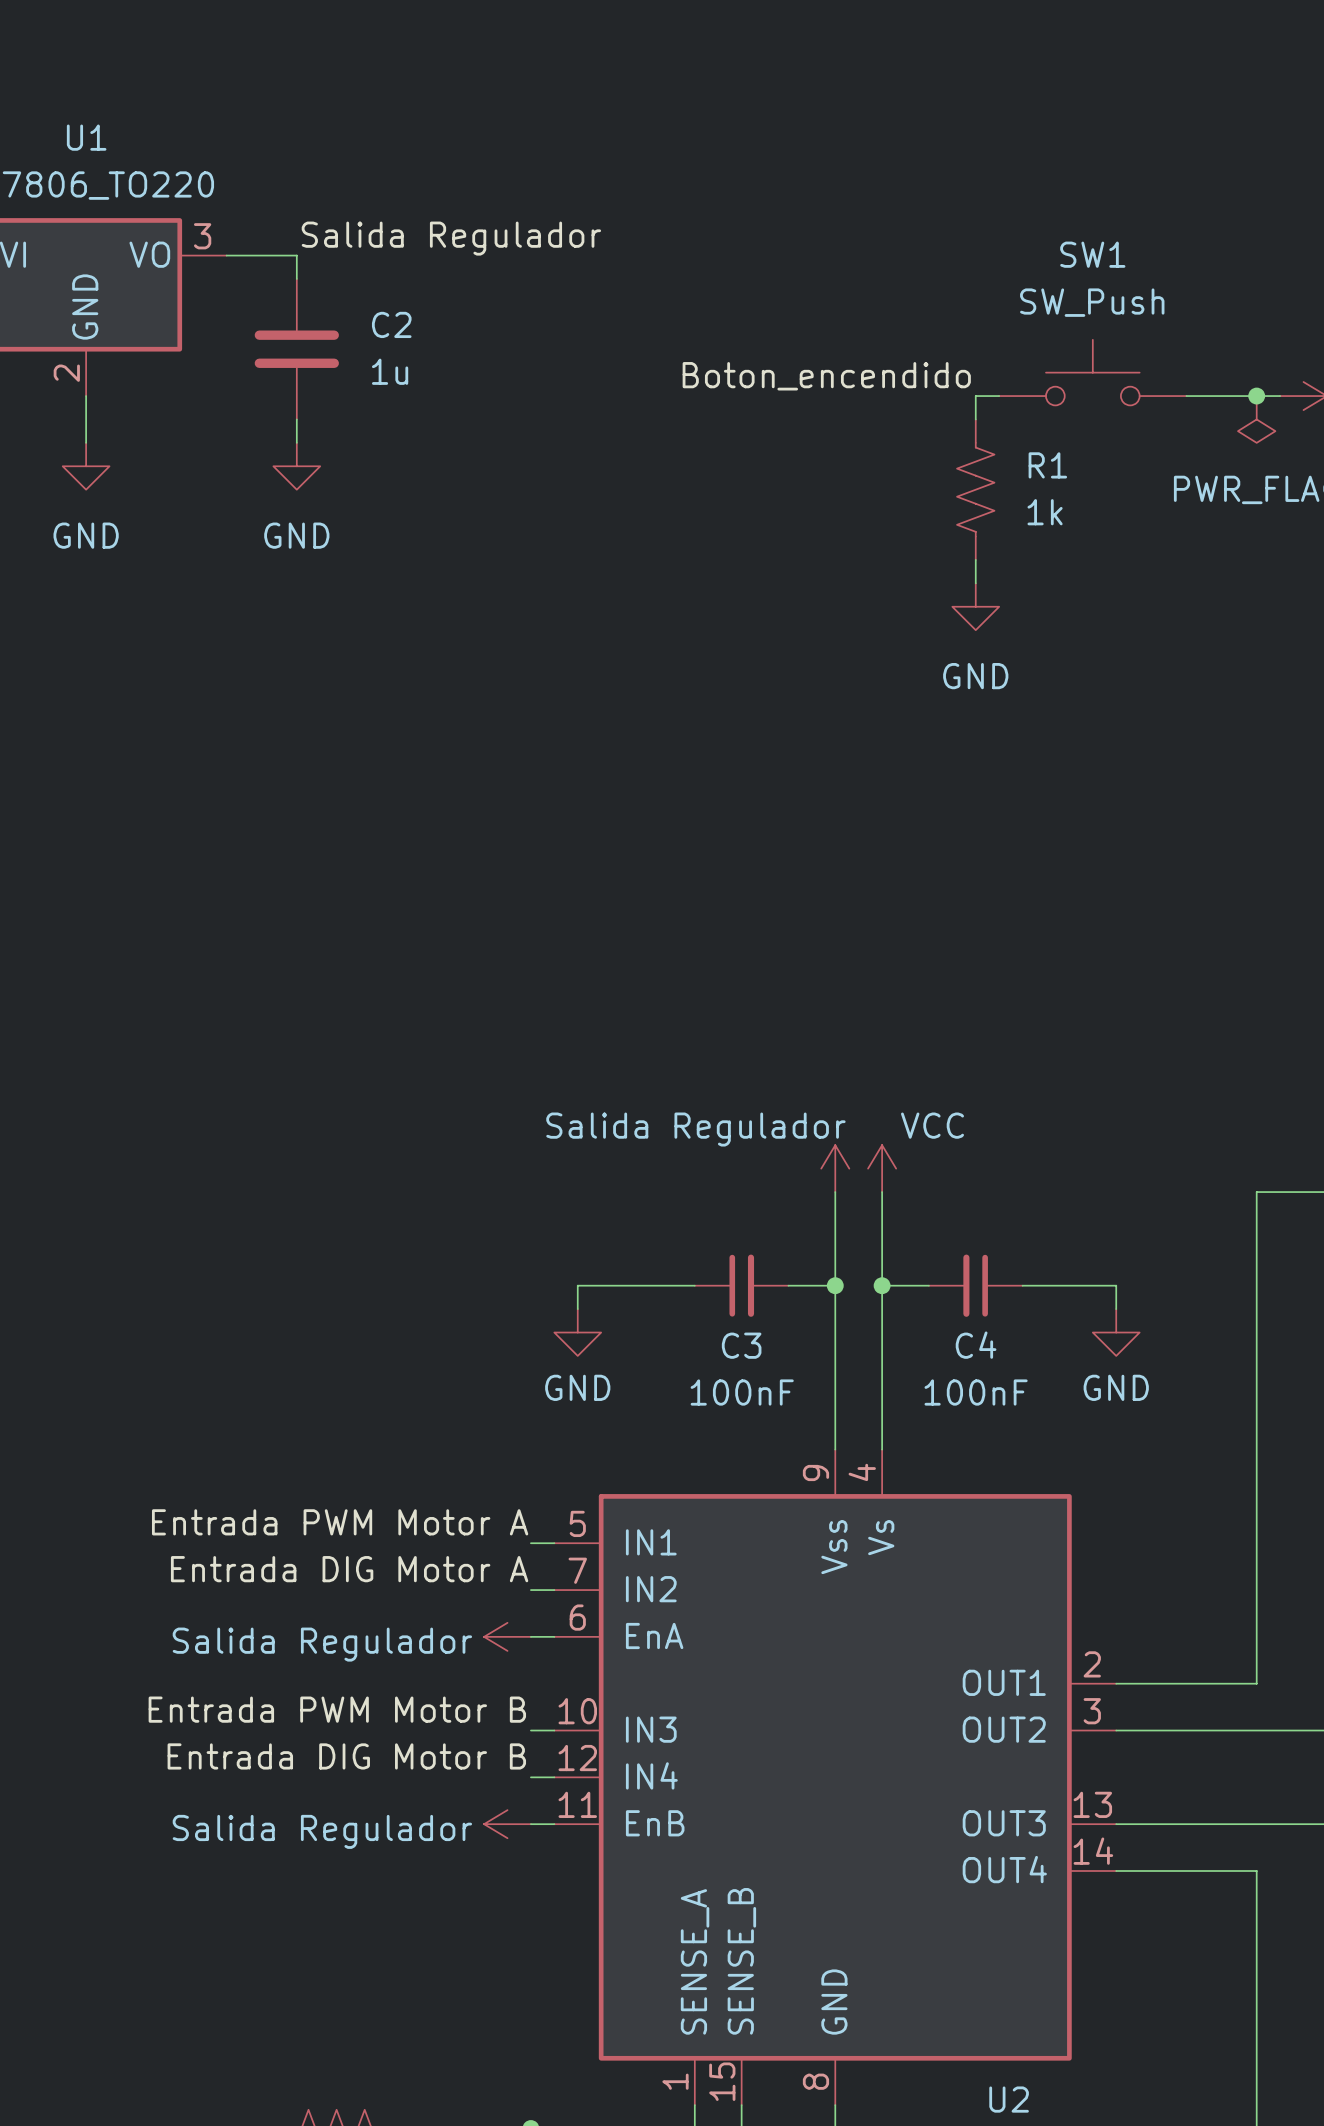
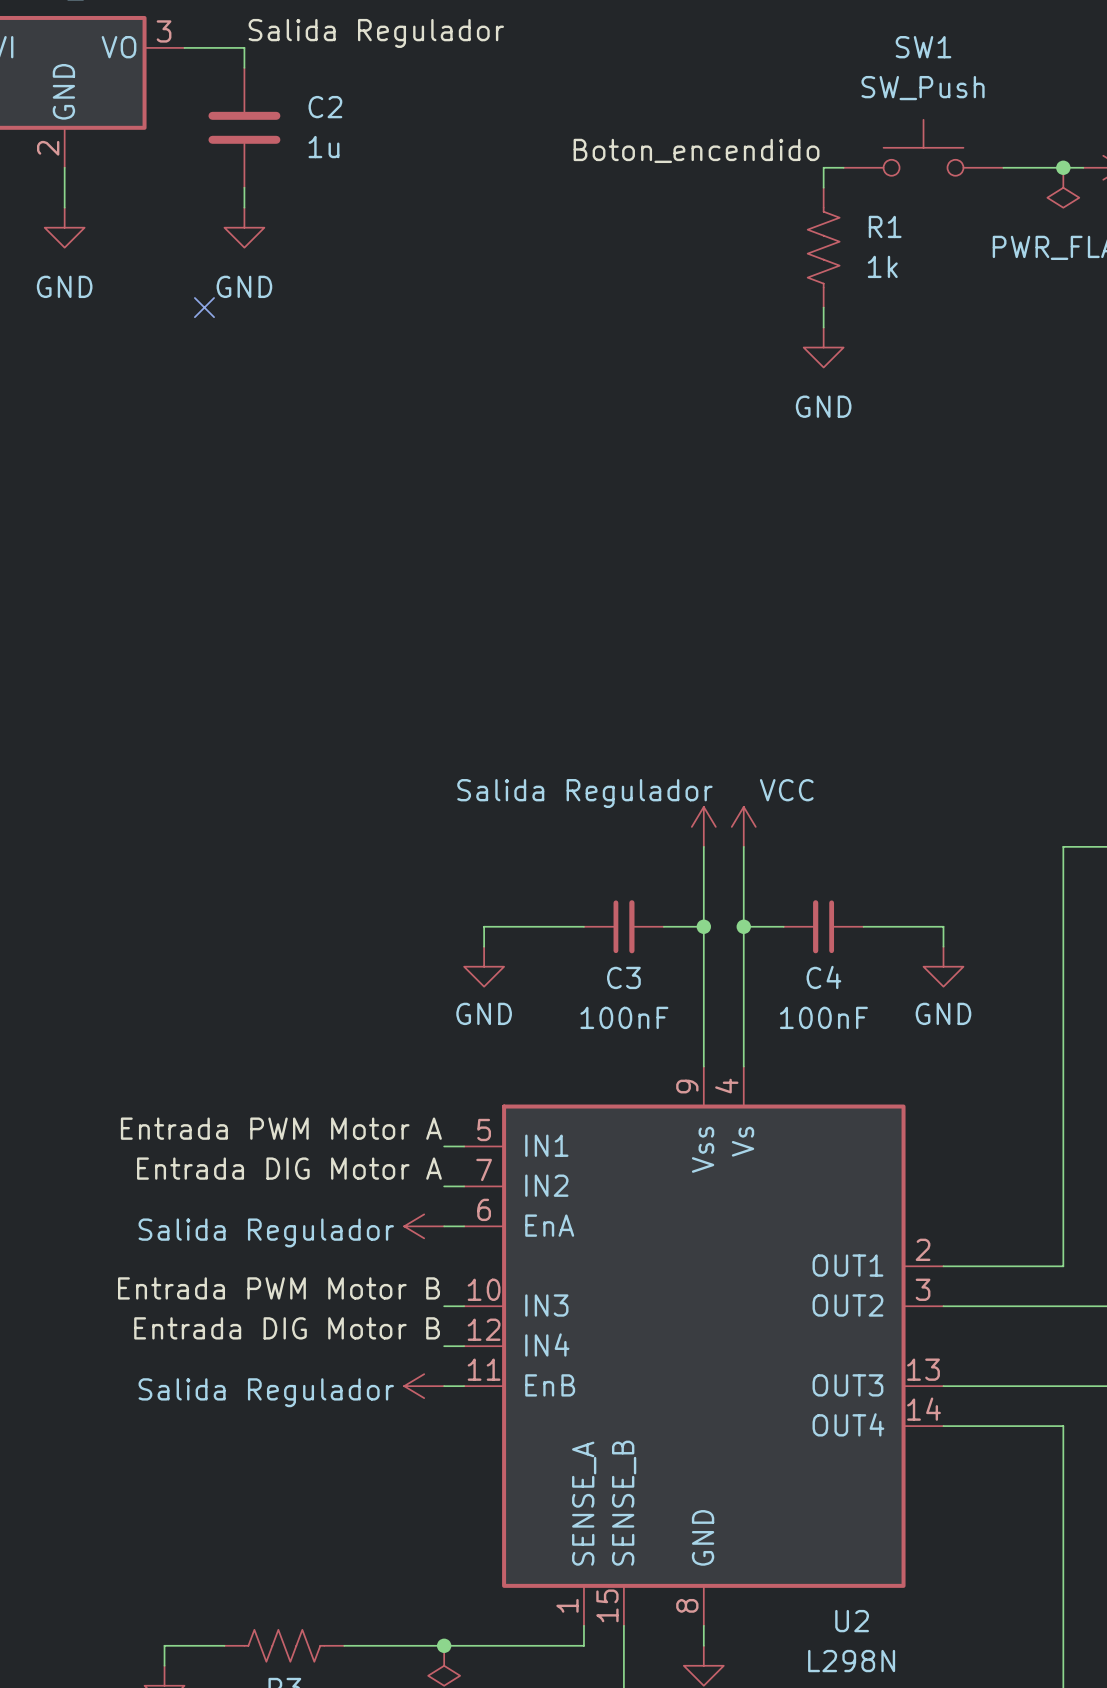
no-connect mark: none -> (204, 307)

